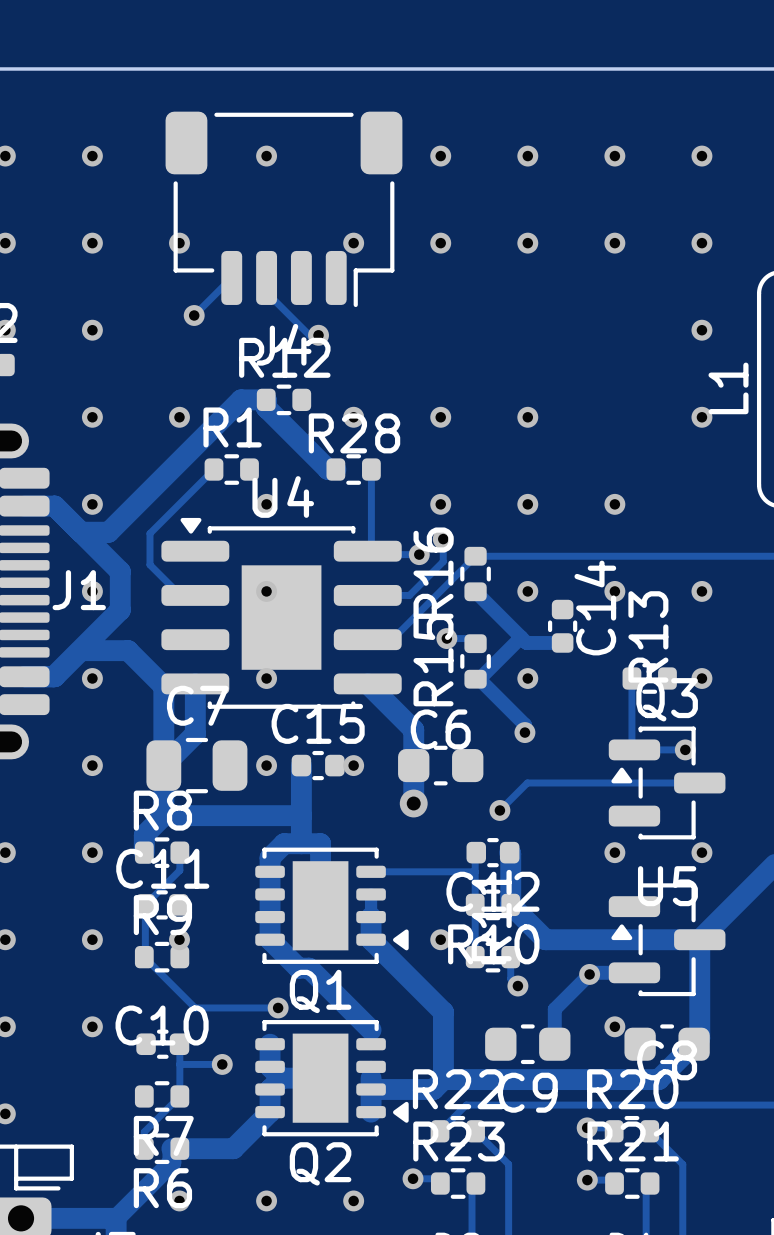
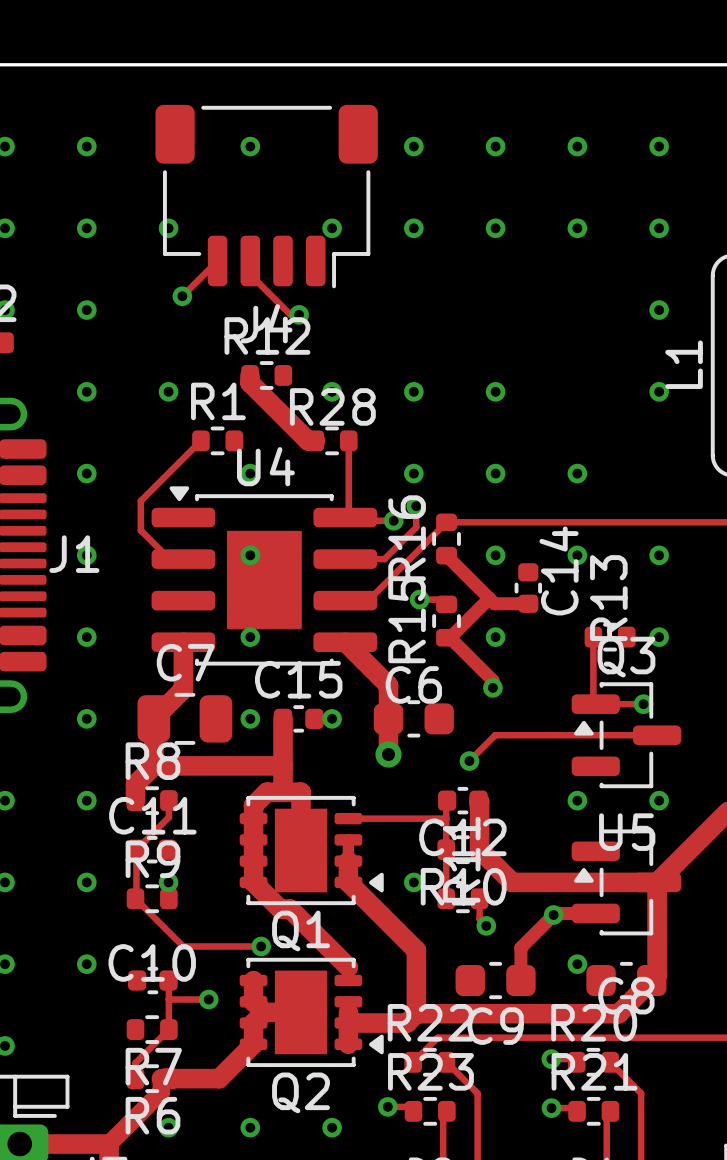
track: (266, 399) (241, 399) (108, 532) (80, 532) -> none
track: (24, 506) (54, 506) (120, 571) (120, 610) (53, 676) -> none
track: (24, 676) (54, 676) (80, 650) (128, 650) (163, 686) (163, 765) -> none

